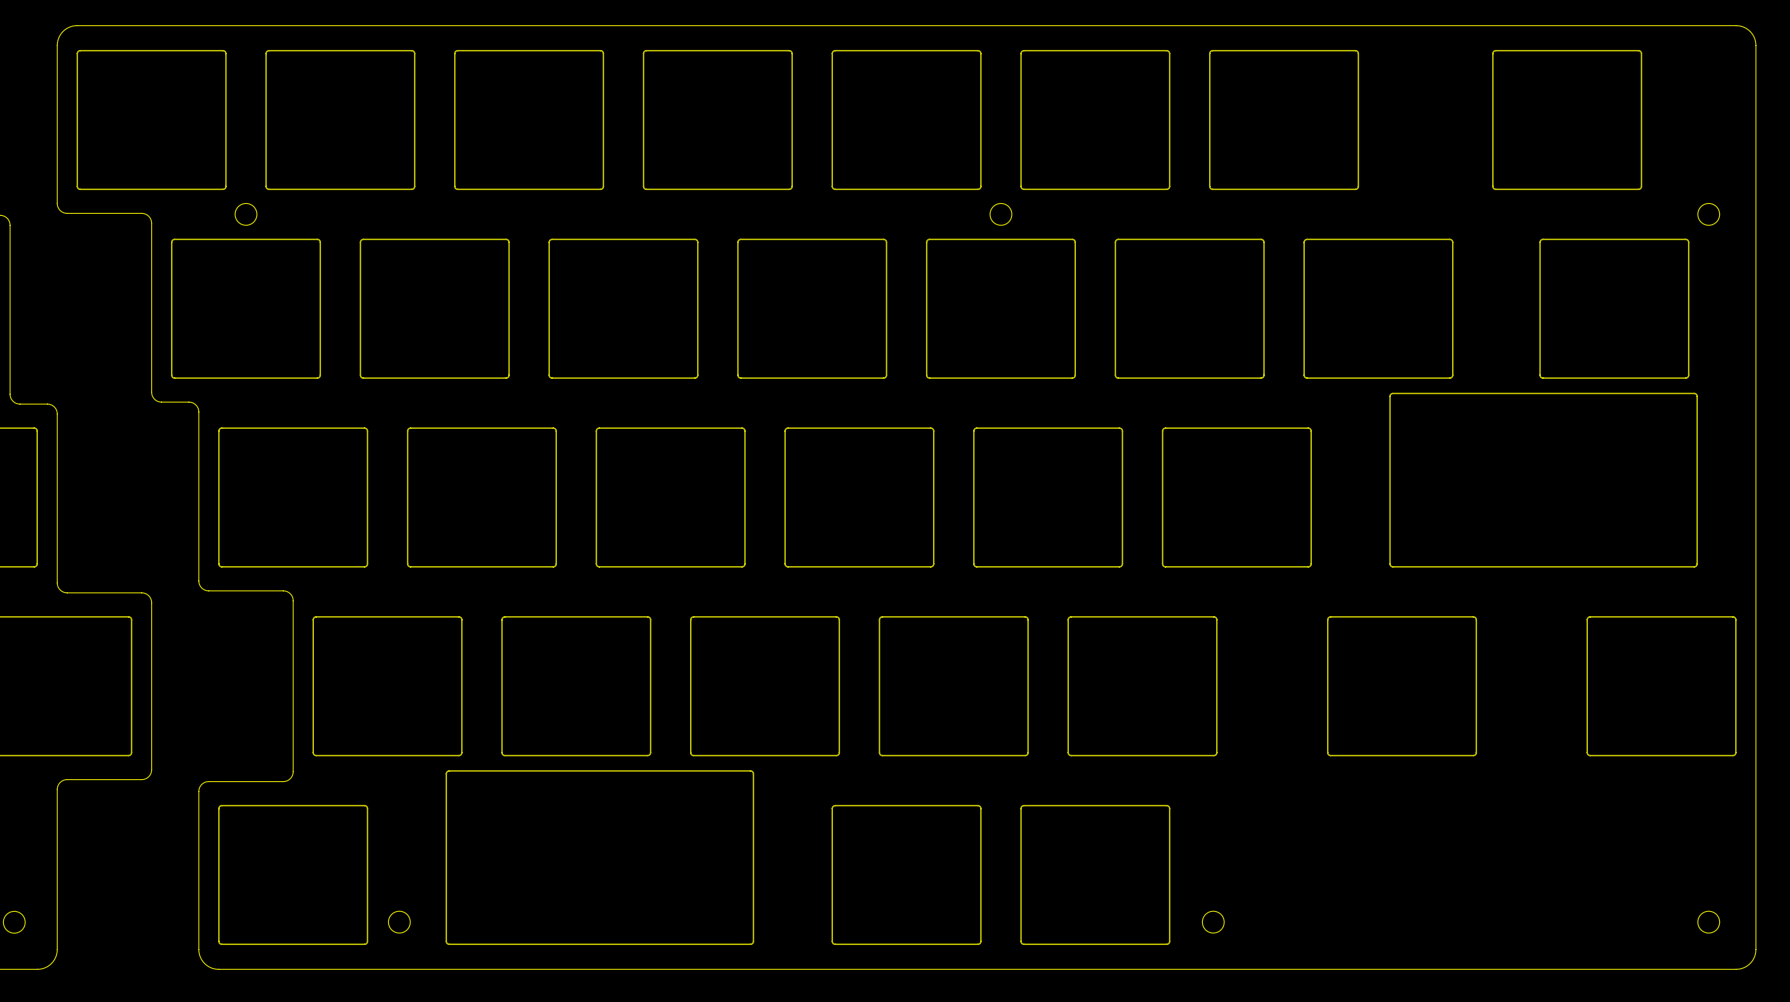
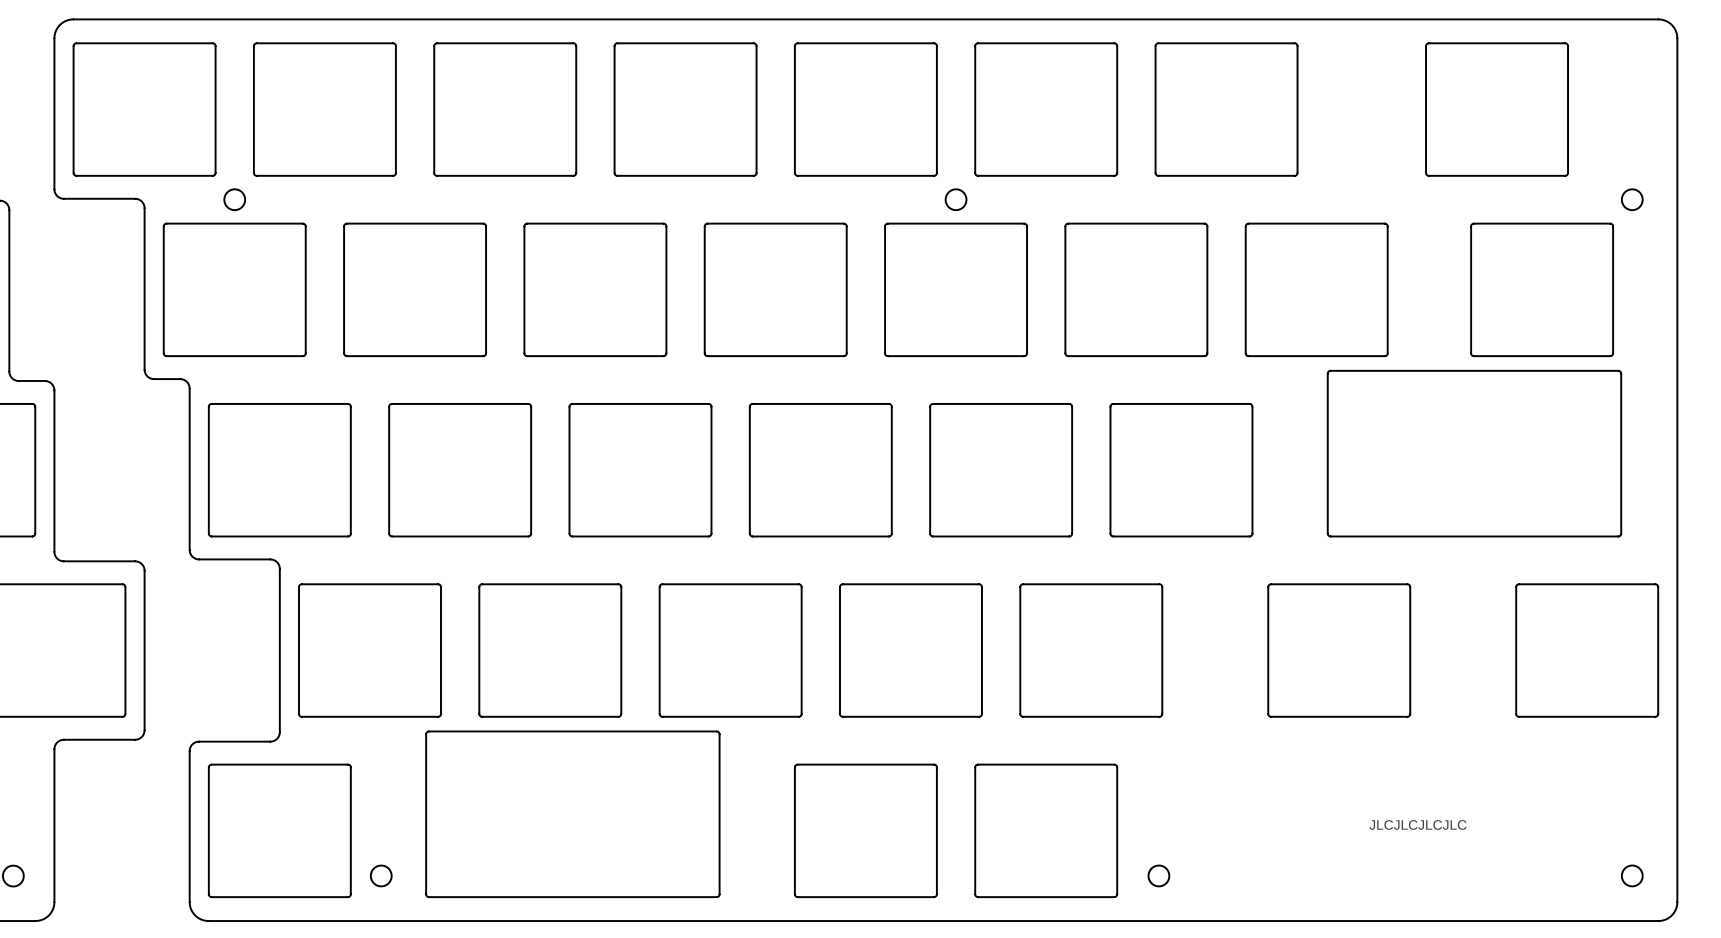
text: none -> JLCJLCJLCJLC (1417, 824)

